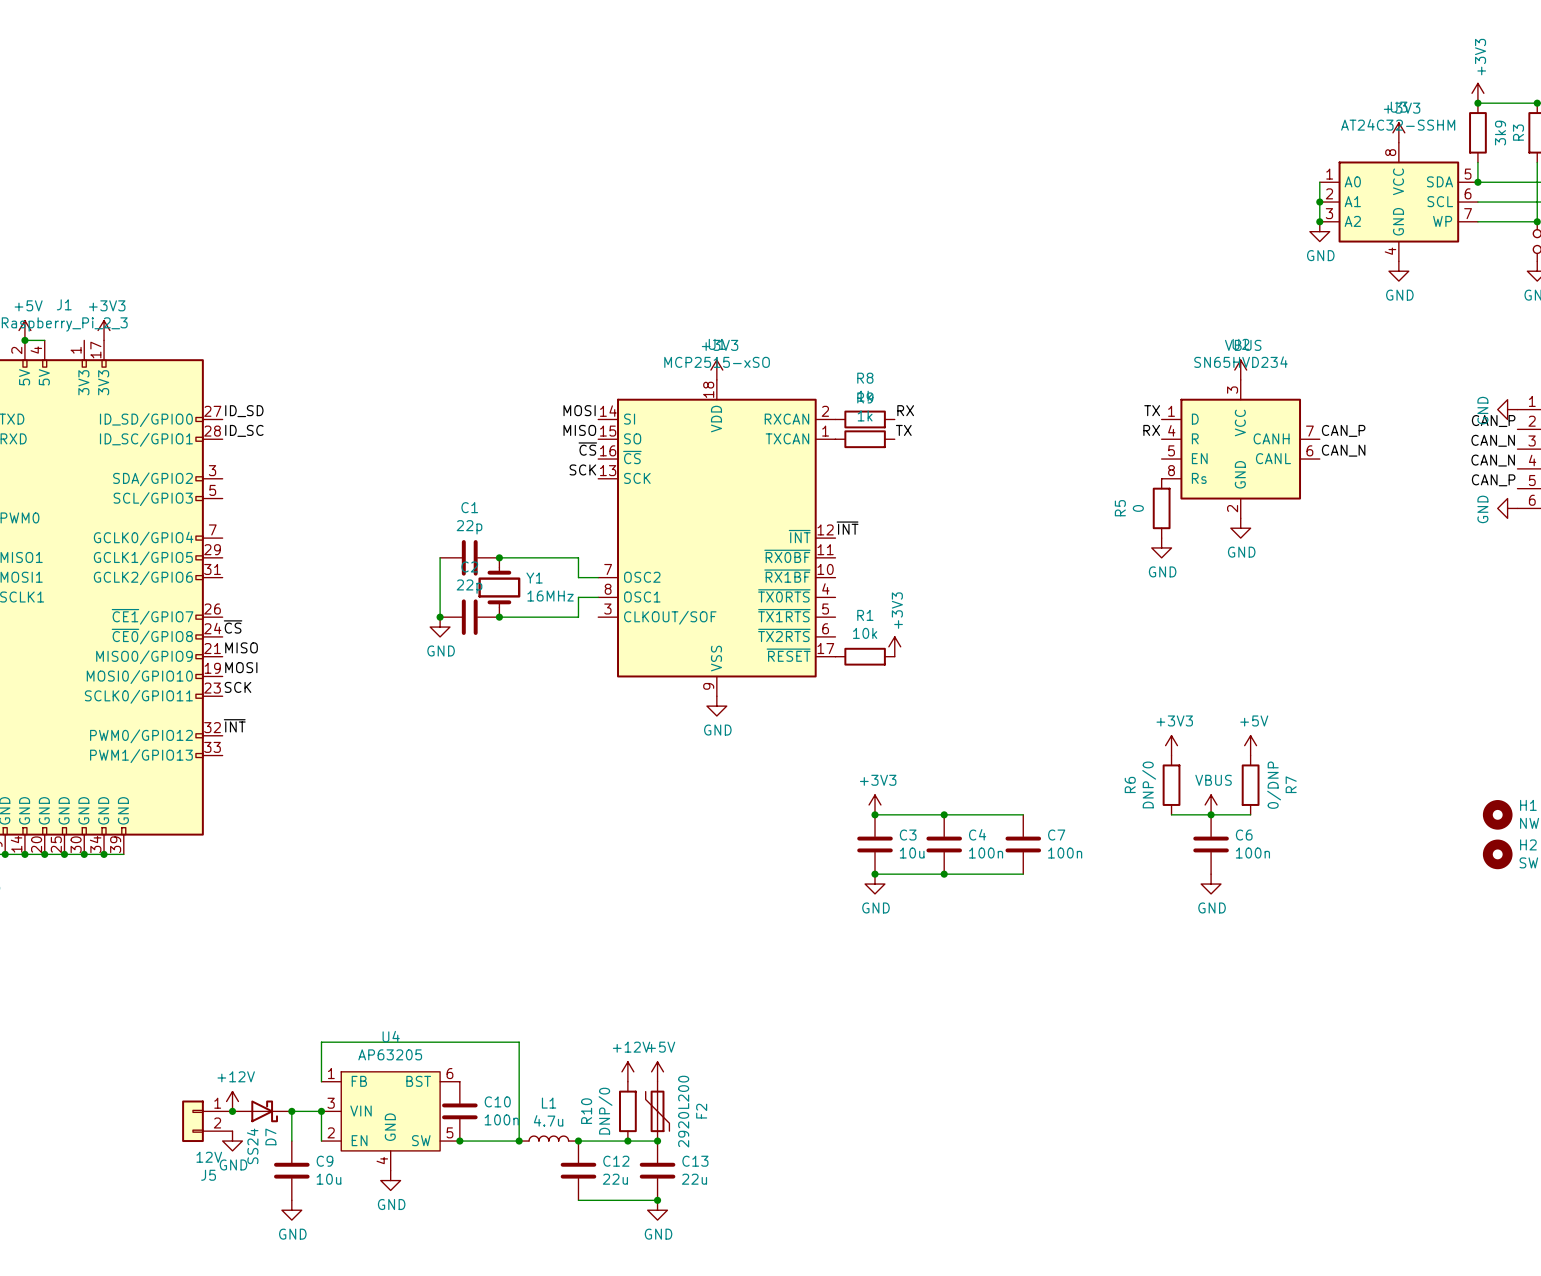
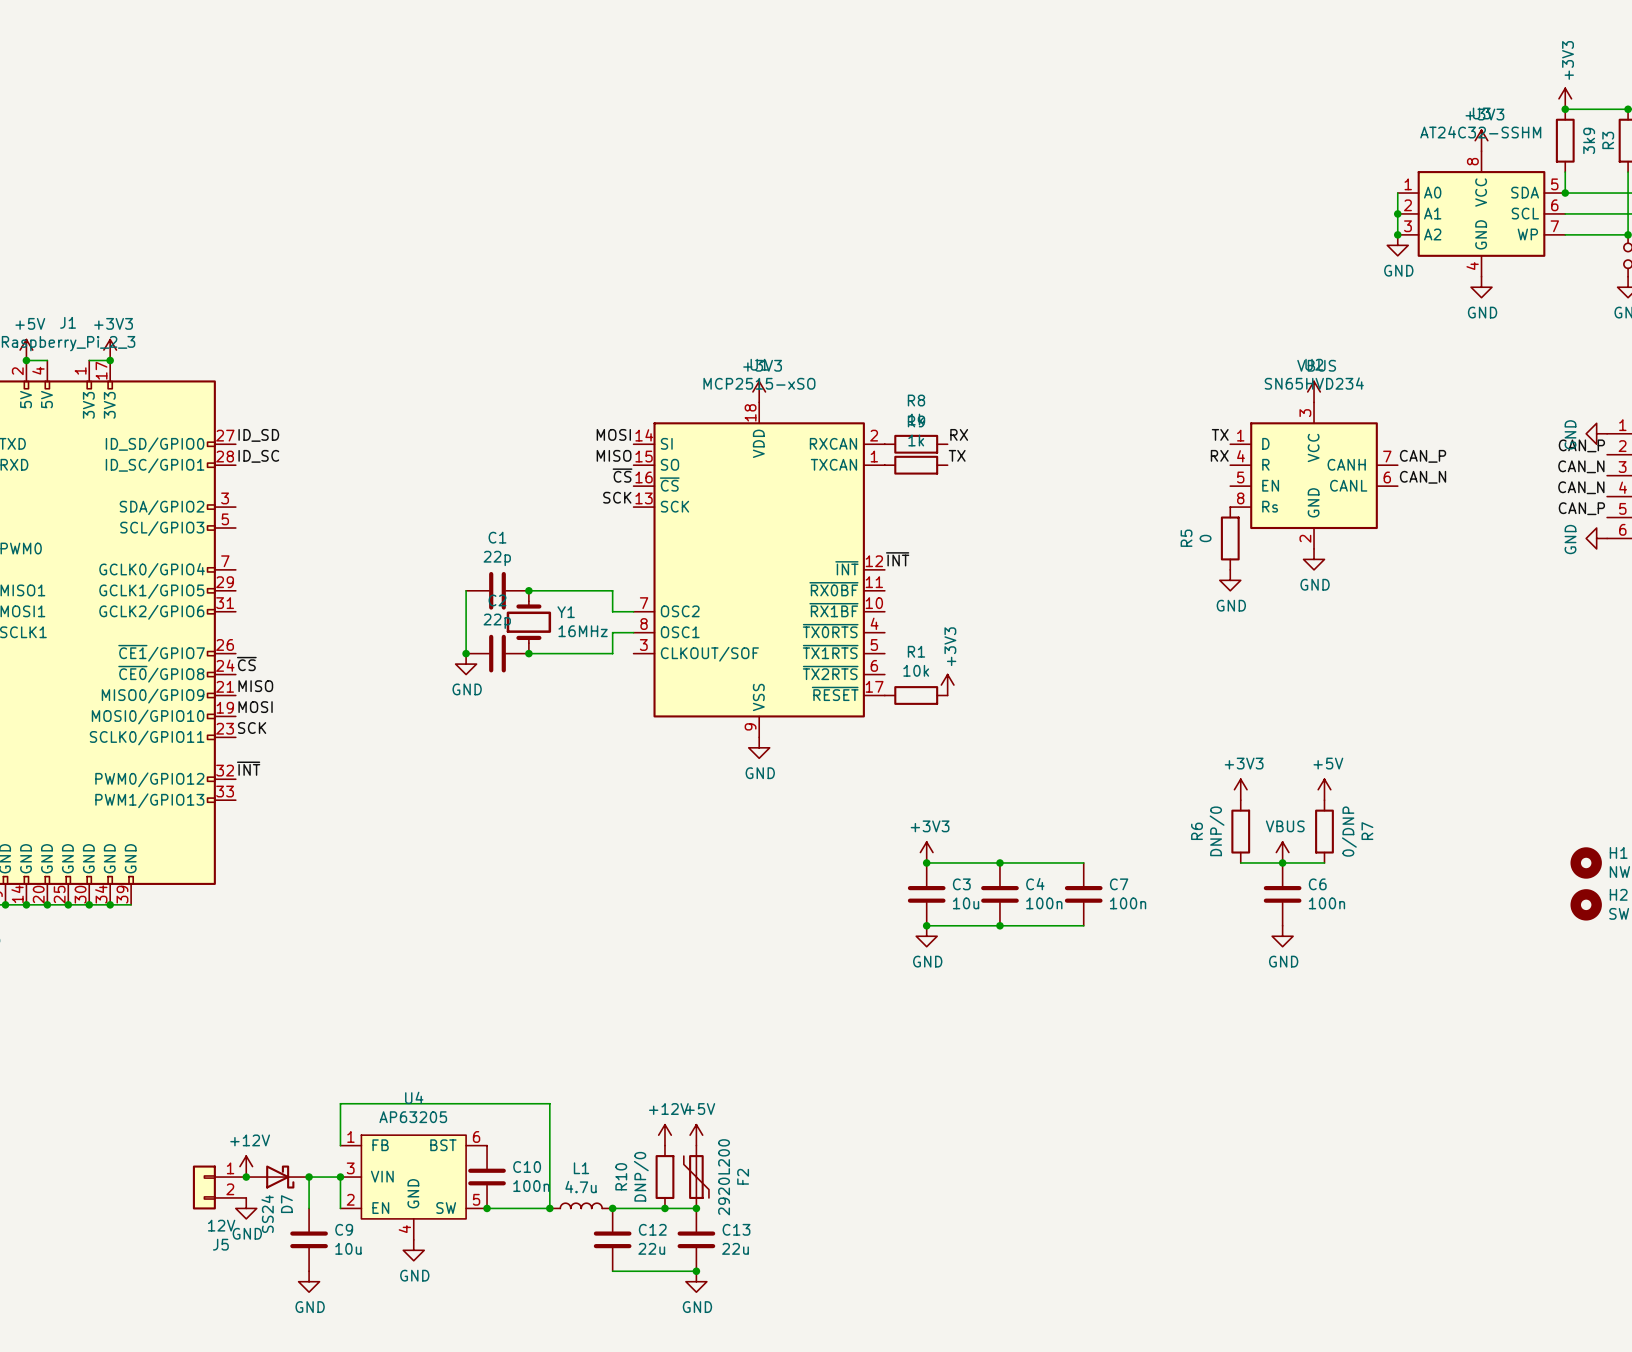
wire: none -> (89, 360) (110, 360)
junction: none -> (110, 360)

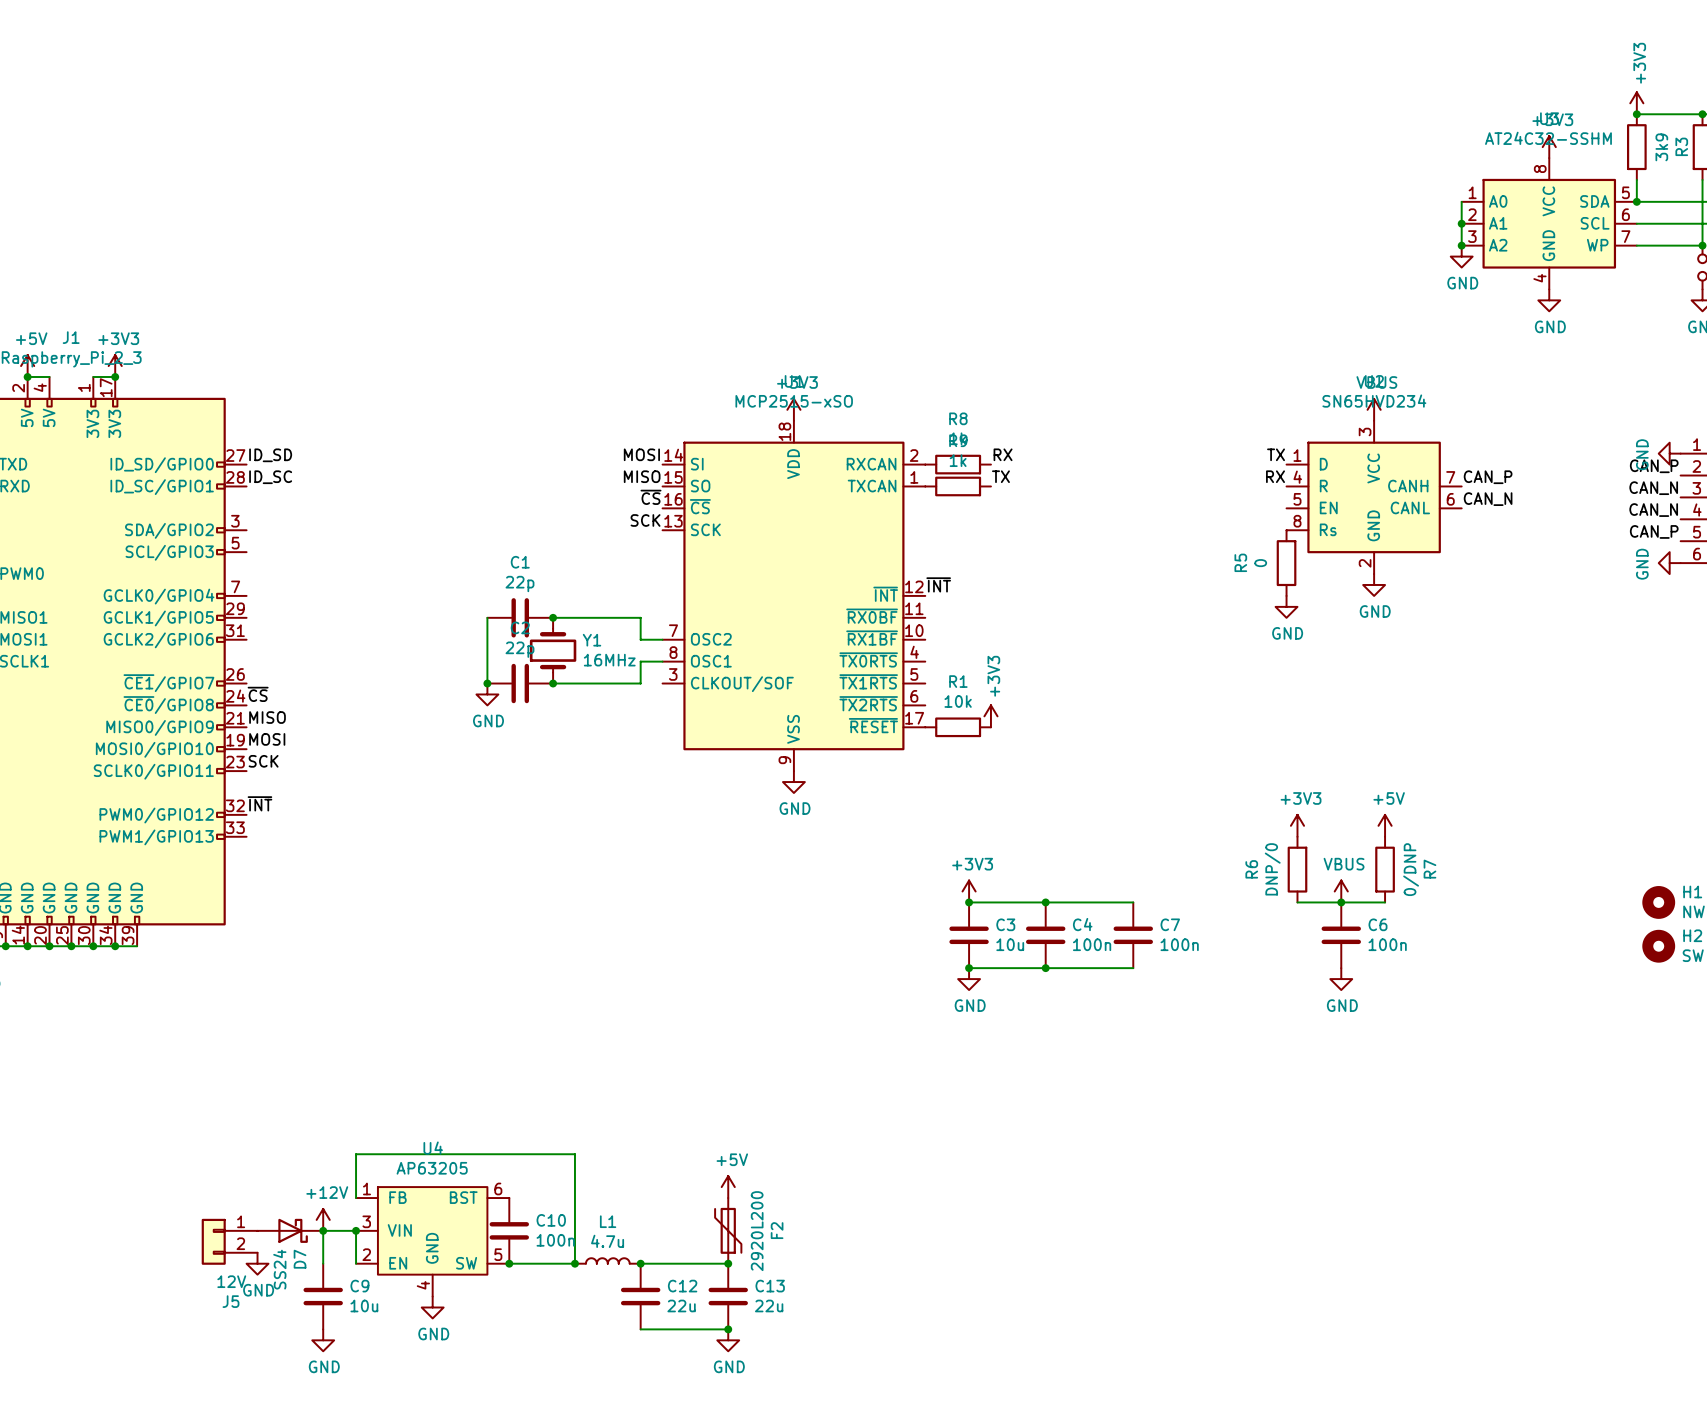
power symbol: +12V (664, 1135) -> none
power symbol position: +12V (246, 1166) -> +12V (323, 1219)
junction: (246, 1177) -> none
R10: DNP/0 (664, 1177) -> none
junction: (664, 1208) -> none

